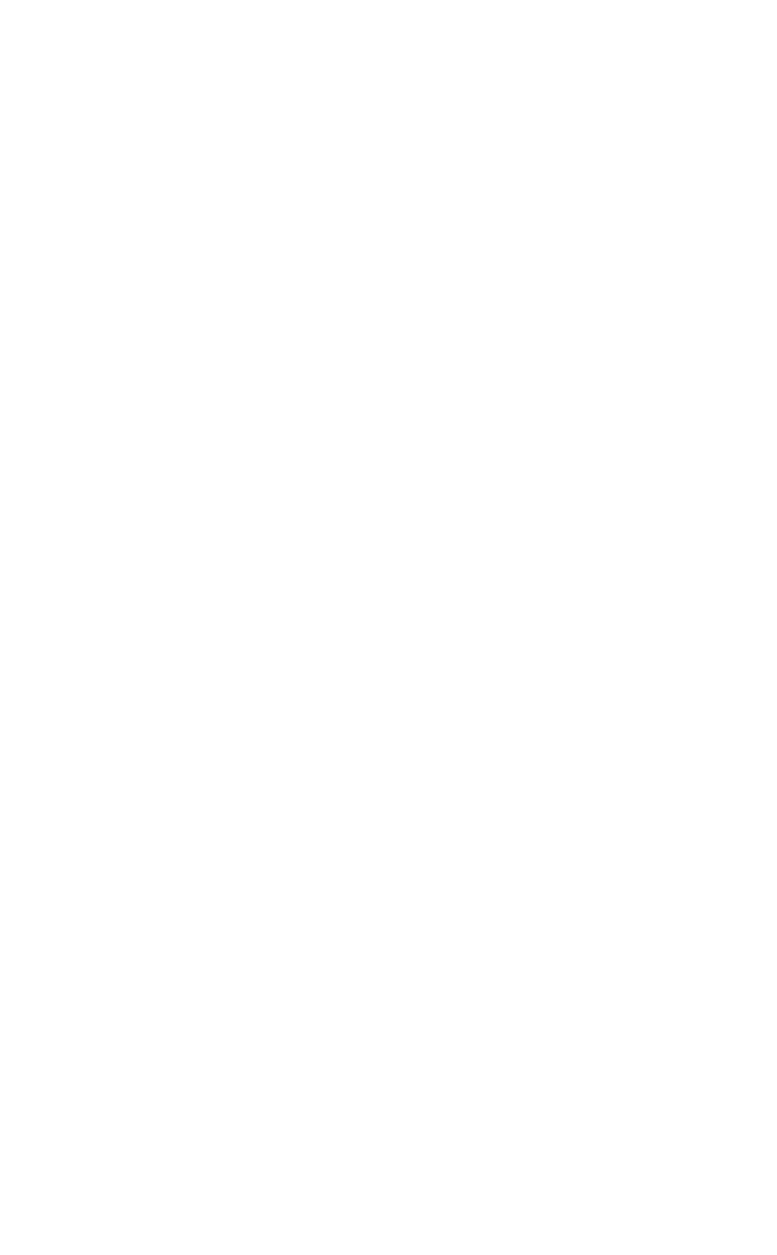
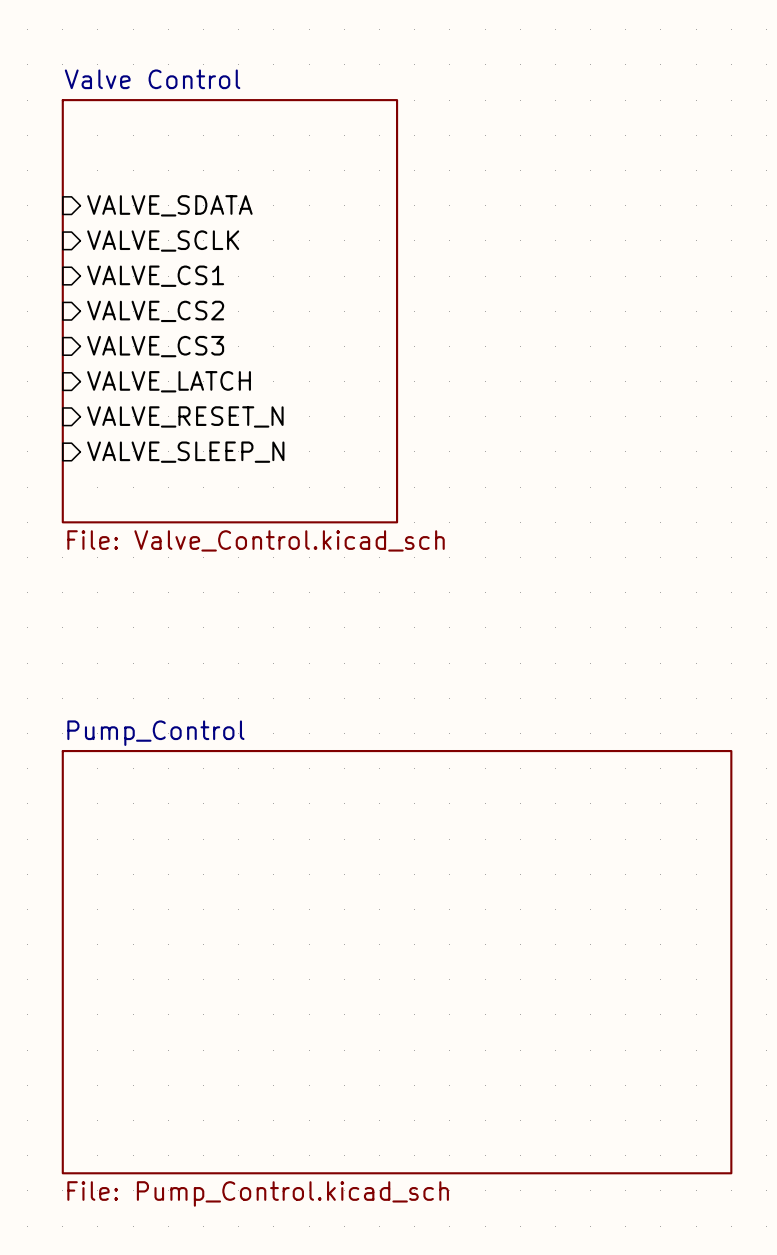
sheet pin: none -> VALVE_SDATA (169, 205)
sheet pin: none -> VALVE_SCLK (163, 241)
sheet pin: none -> VALVE_CS1 (155, 276)
sheet pin: none -> VALVE_CS2 (155, 311)
sheet Valve Control: none -> File: Valve_Control.kicad_sch (229, 311)
sheet pin: none -> VALVE_CS3 (155, 346)
sheet pin: none -> VALVE_LATCH (169, 381)
sheet pin: none -> VALVE_RESET_N (185, 416)
sheet pin: none -> VALVE_SLEEP_N (185, 452)
sheet Pump_Control: none -> File: Pump_Control.kicad_sch (397, 962)

